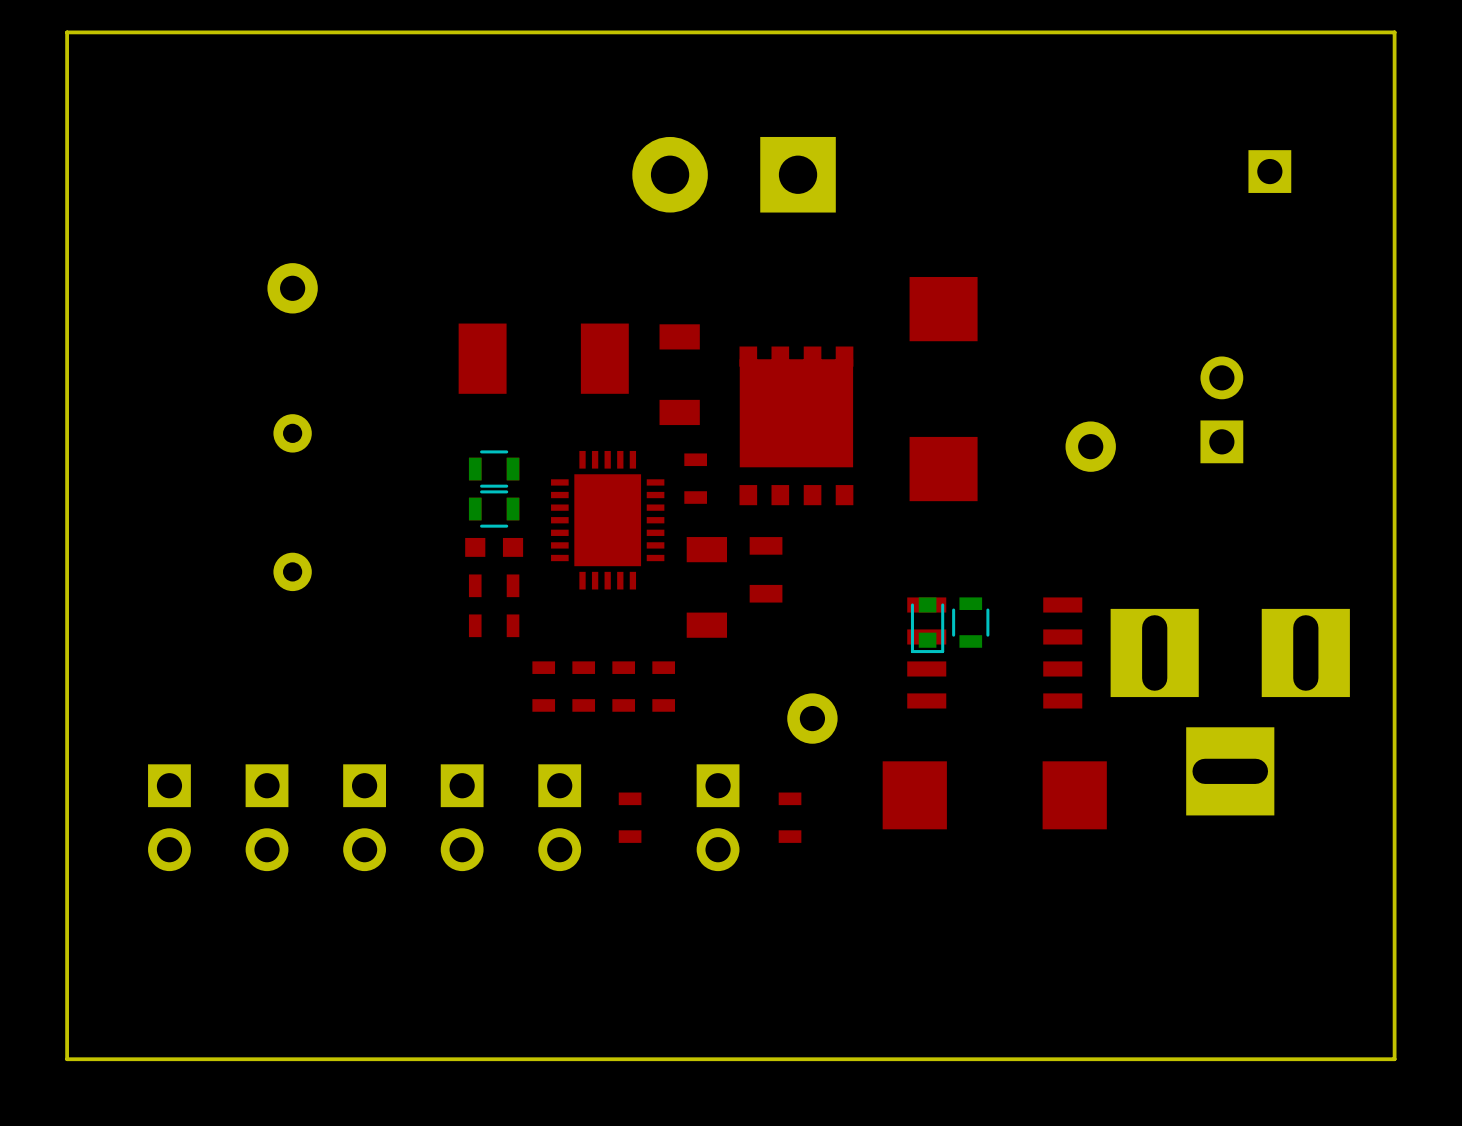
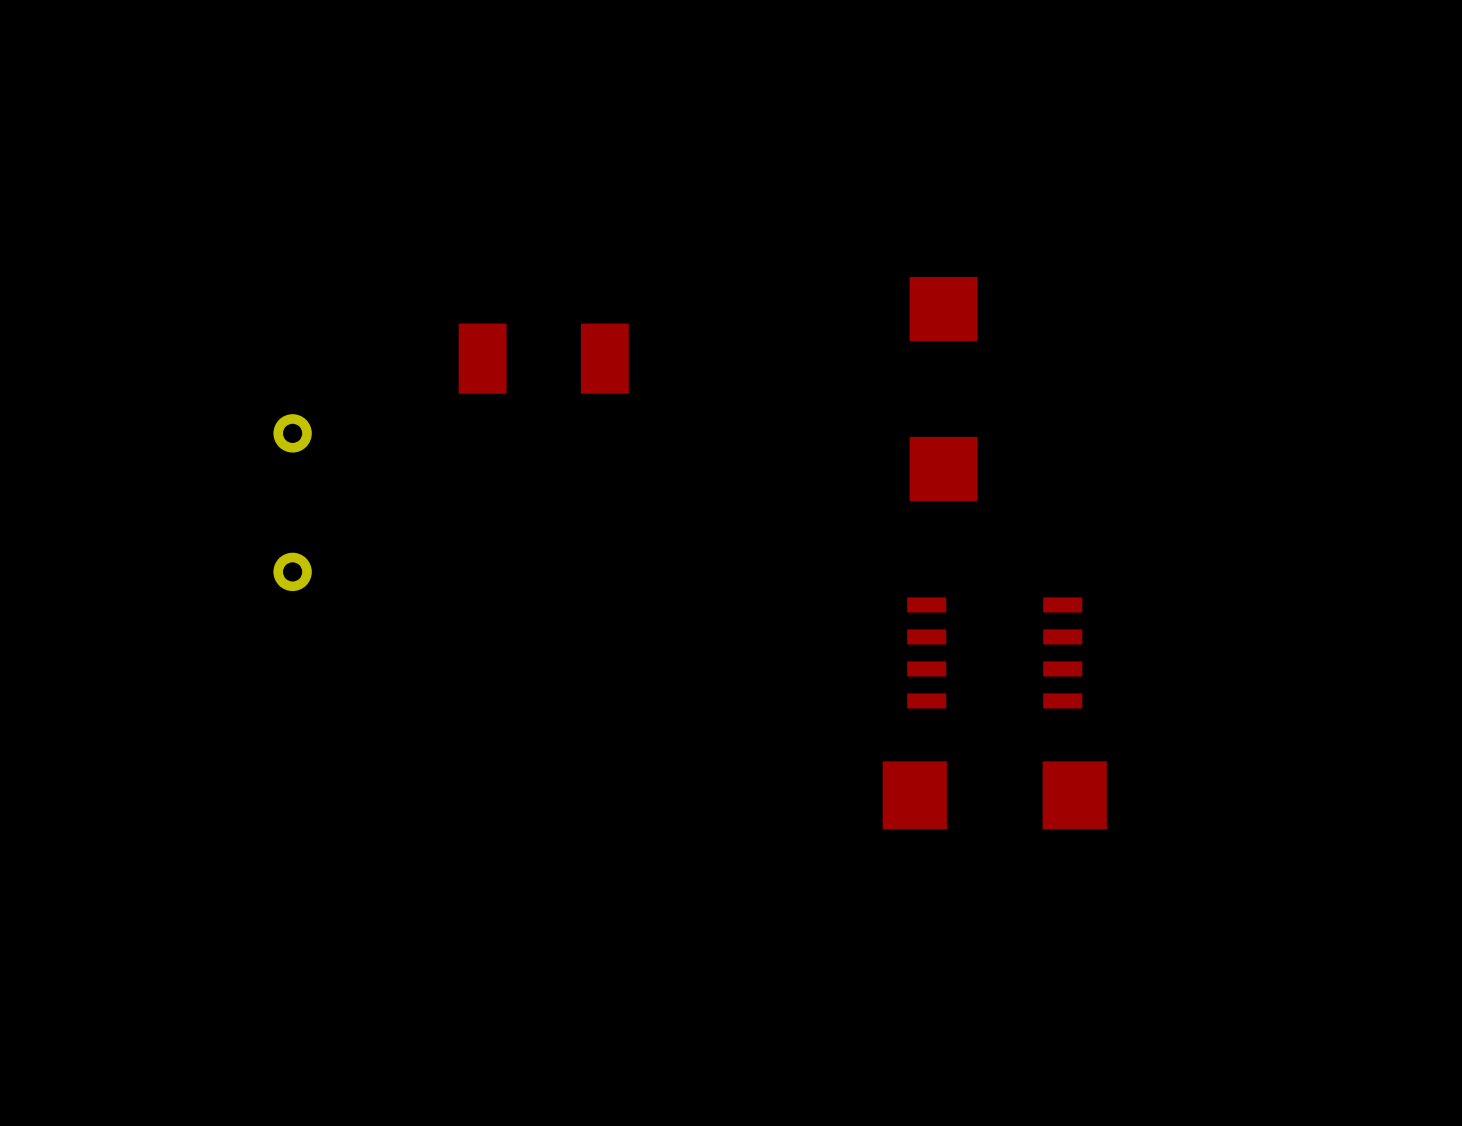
board edge: (1394, 32) (1394, 1059) (67, 1059) (67, 32) (1394, 32) -> none
part: (1269, 171) -> none
part: (734, 174) -> none
part: (292, 288) -> none
part: (679, 374) -> none
part: (1221, 409) -> none
part: (796, 425) -> none
part: (1090, 446) -> none
part: (494, 469) -> none
part: (695, 478) -> none
part: (494, 509) -> none
part: (607, 520) -> none
part: (494, 547) -> none
part: (766, 569) -> none
part: (494, 585) -> none
part: (706, 587) -> none
part: (970, 622) -> none
part: (494, 625) -> none
part: (927, 625) -> none
part: (543, 686) -> none
part: (583, 686) -> none
part: (623, 686) -> none
part: (663, 686) -> none
part: (1230, 712) -> none
part: (812, 718) -> none
part: (169, 817) -> none
part: (267, 817) -> none
part: (364, 817) -> none
part: (462, 817) -> none
part: (559, 817) -> none
part: (630, 817) -> none
part: (718, 817) -> none
part: (790, 817) -> none

